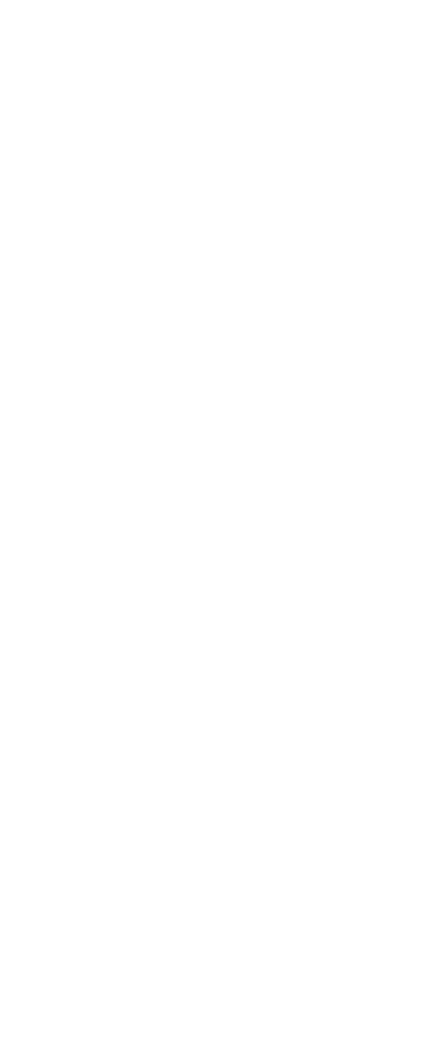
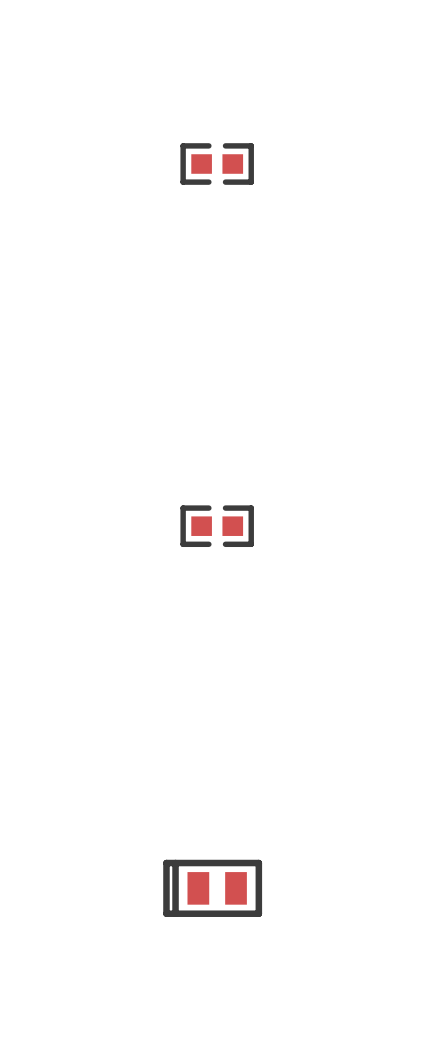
part: none -> (217, 164)
part: none -> (217, 526)
part: none -> (212, 888)

